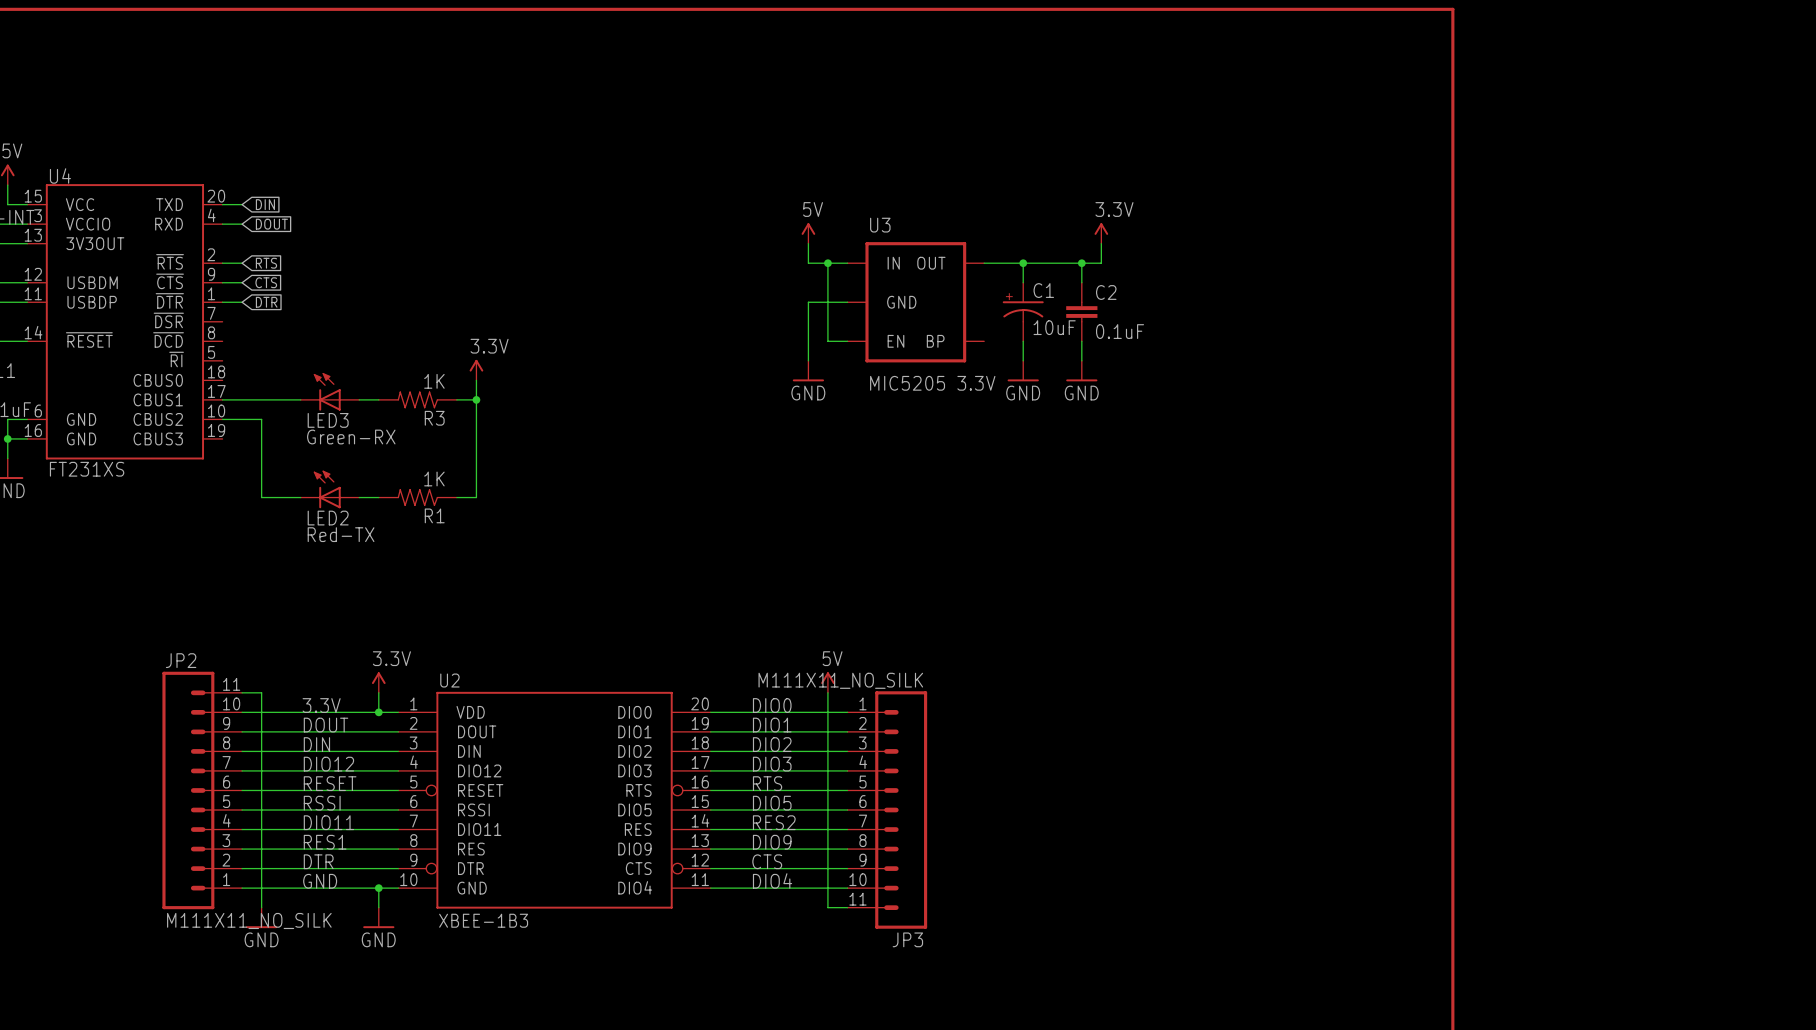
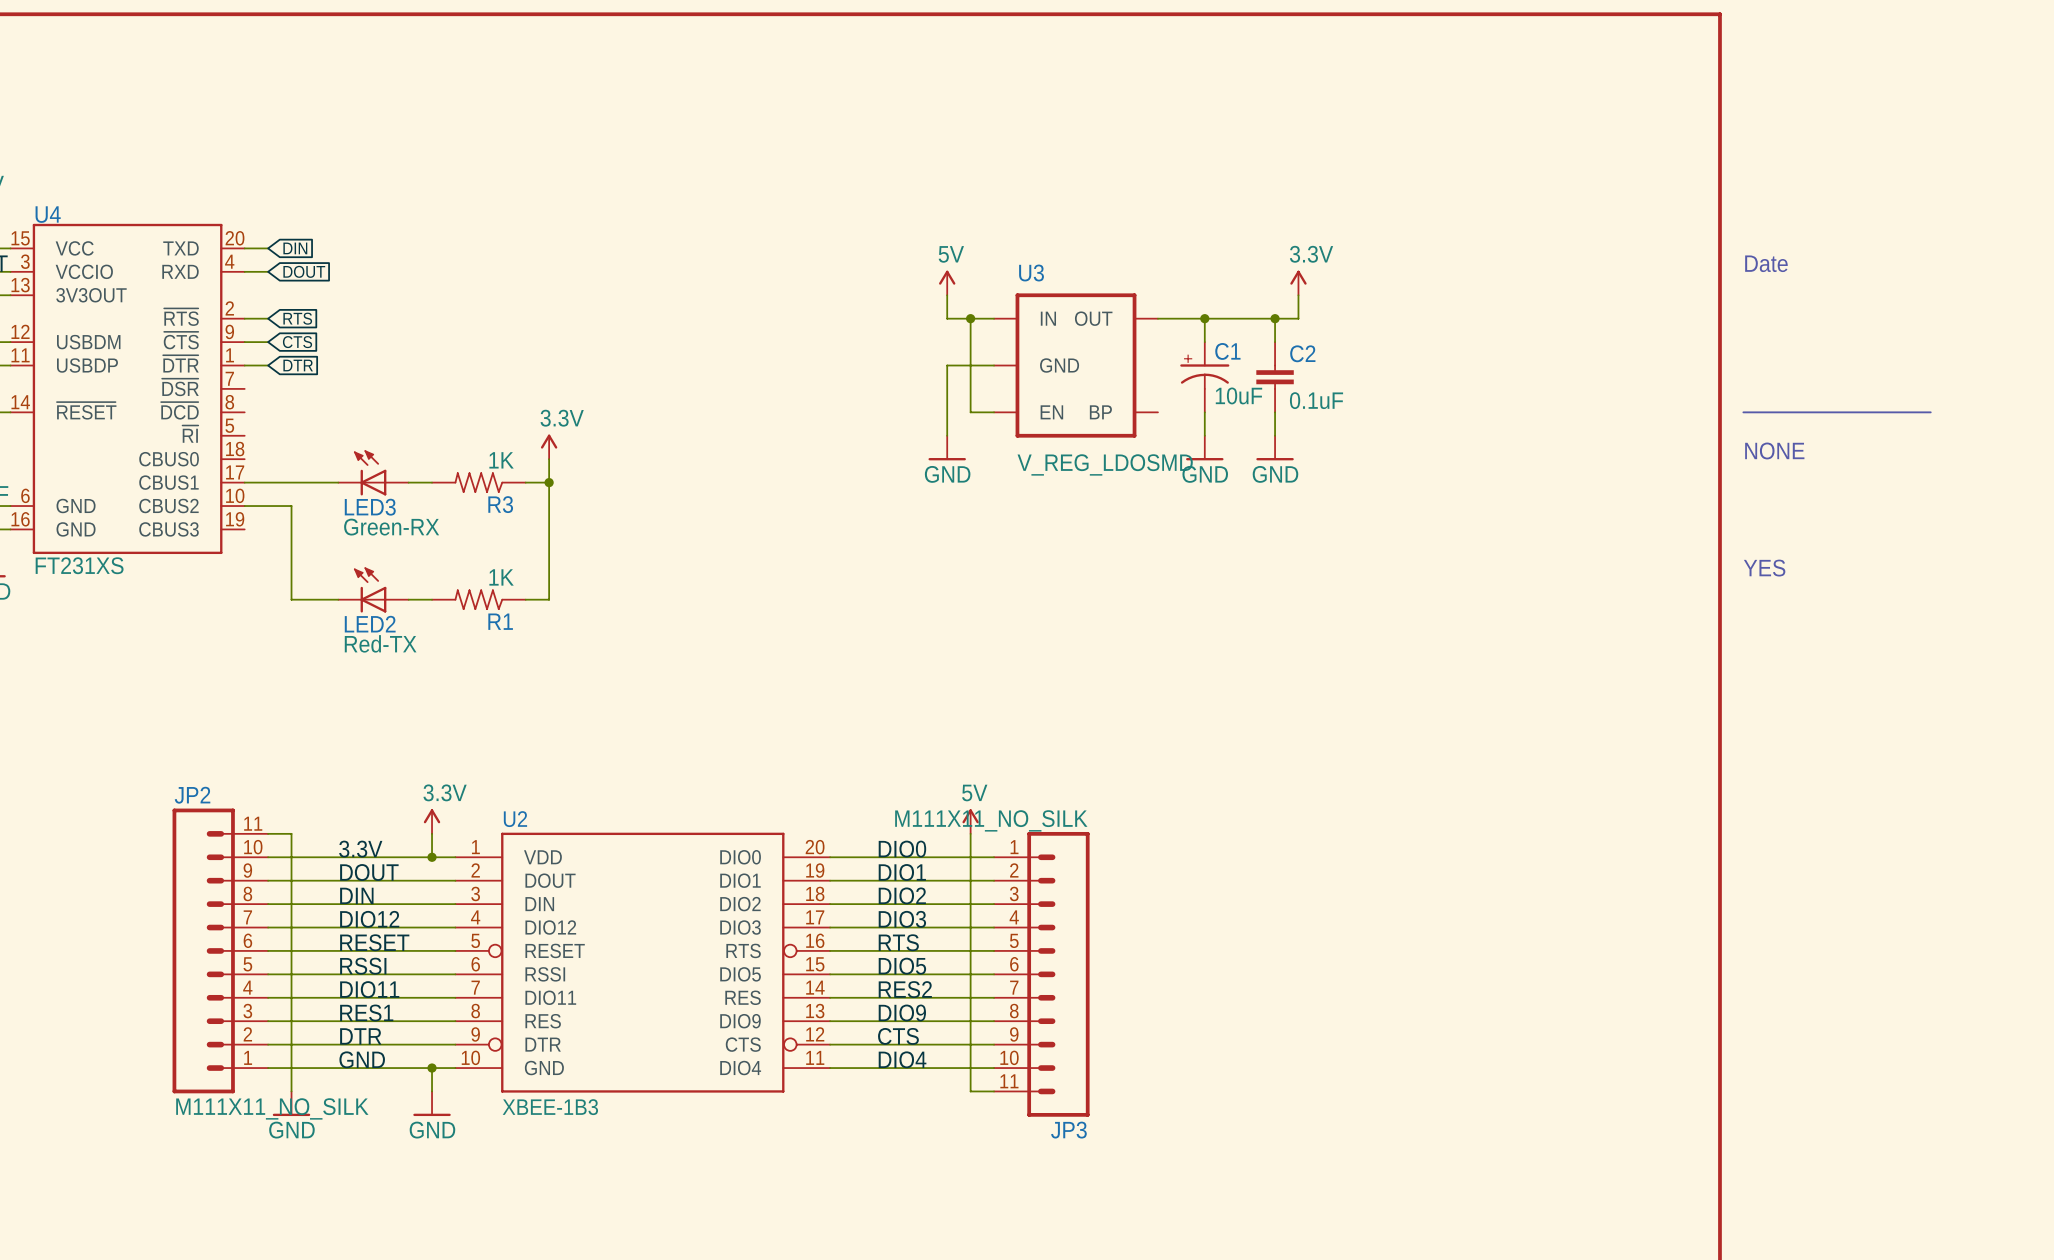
text: none -> Date (1766, 263)
line: none -> (1743, 412) (1930, 412)
text: none -> NONE (1774, 450)
U3 value: MIC5205 3.3V (932, 383) -> V_REG_LDOSMD (1105, 464)
text: none -> YES (1764, 568)

